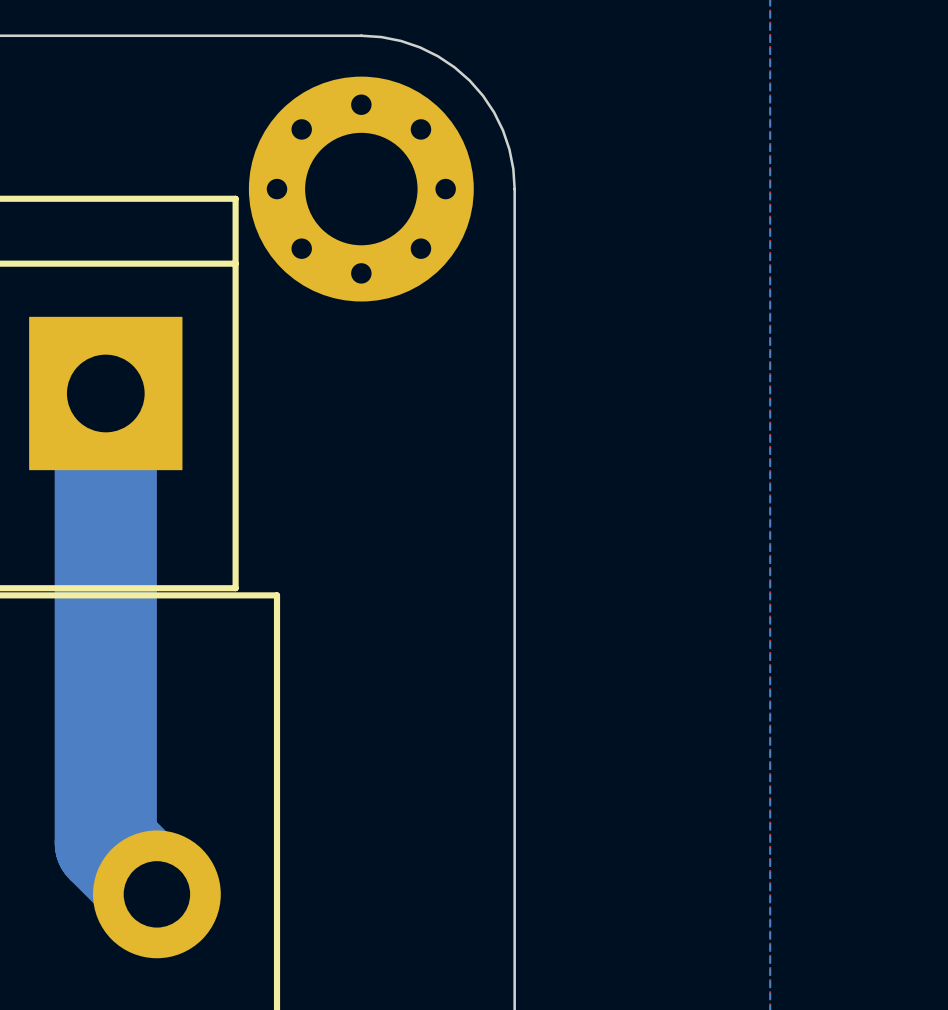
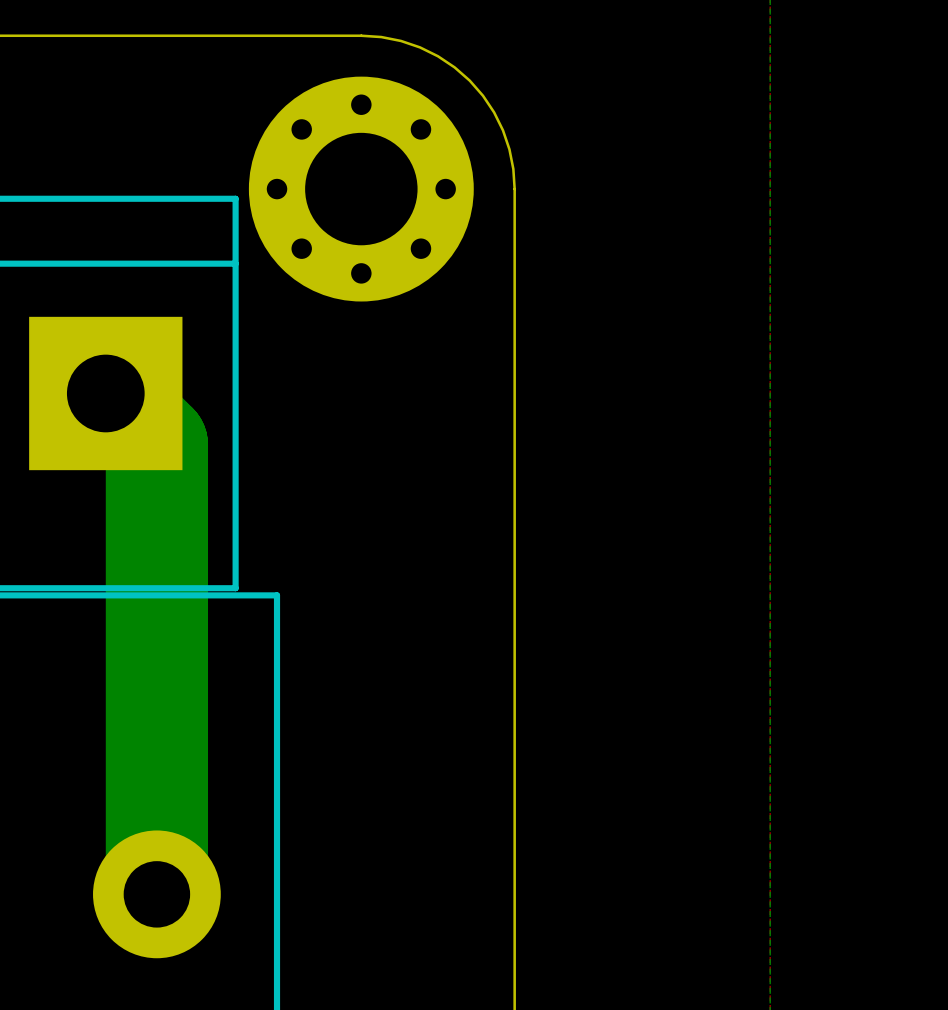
bottom track: (105, 393) (105, 843) (156, 894) -> (105, 393) (156, 444) (156, 894)

